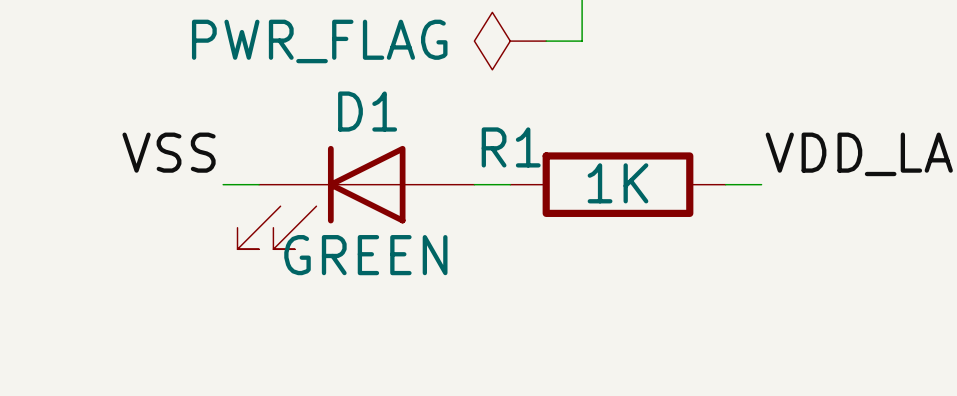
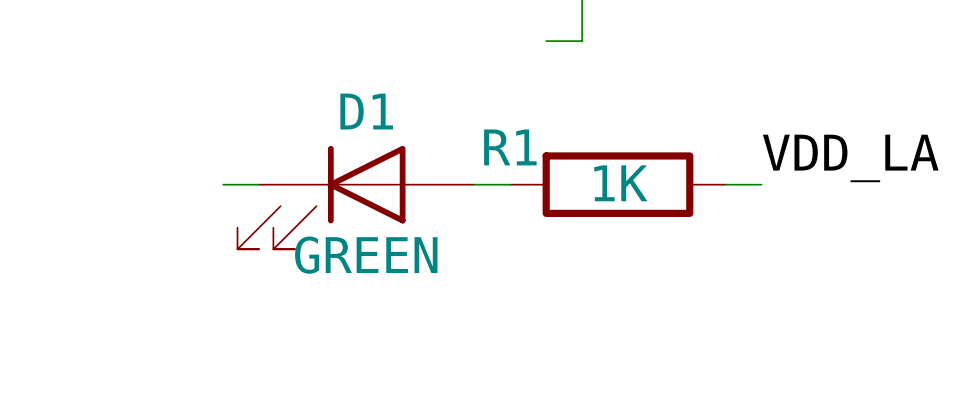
power symbol: PWR_FLAG (510, 41) -> none
label: VSS (169, 152) -> none

